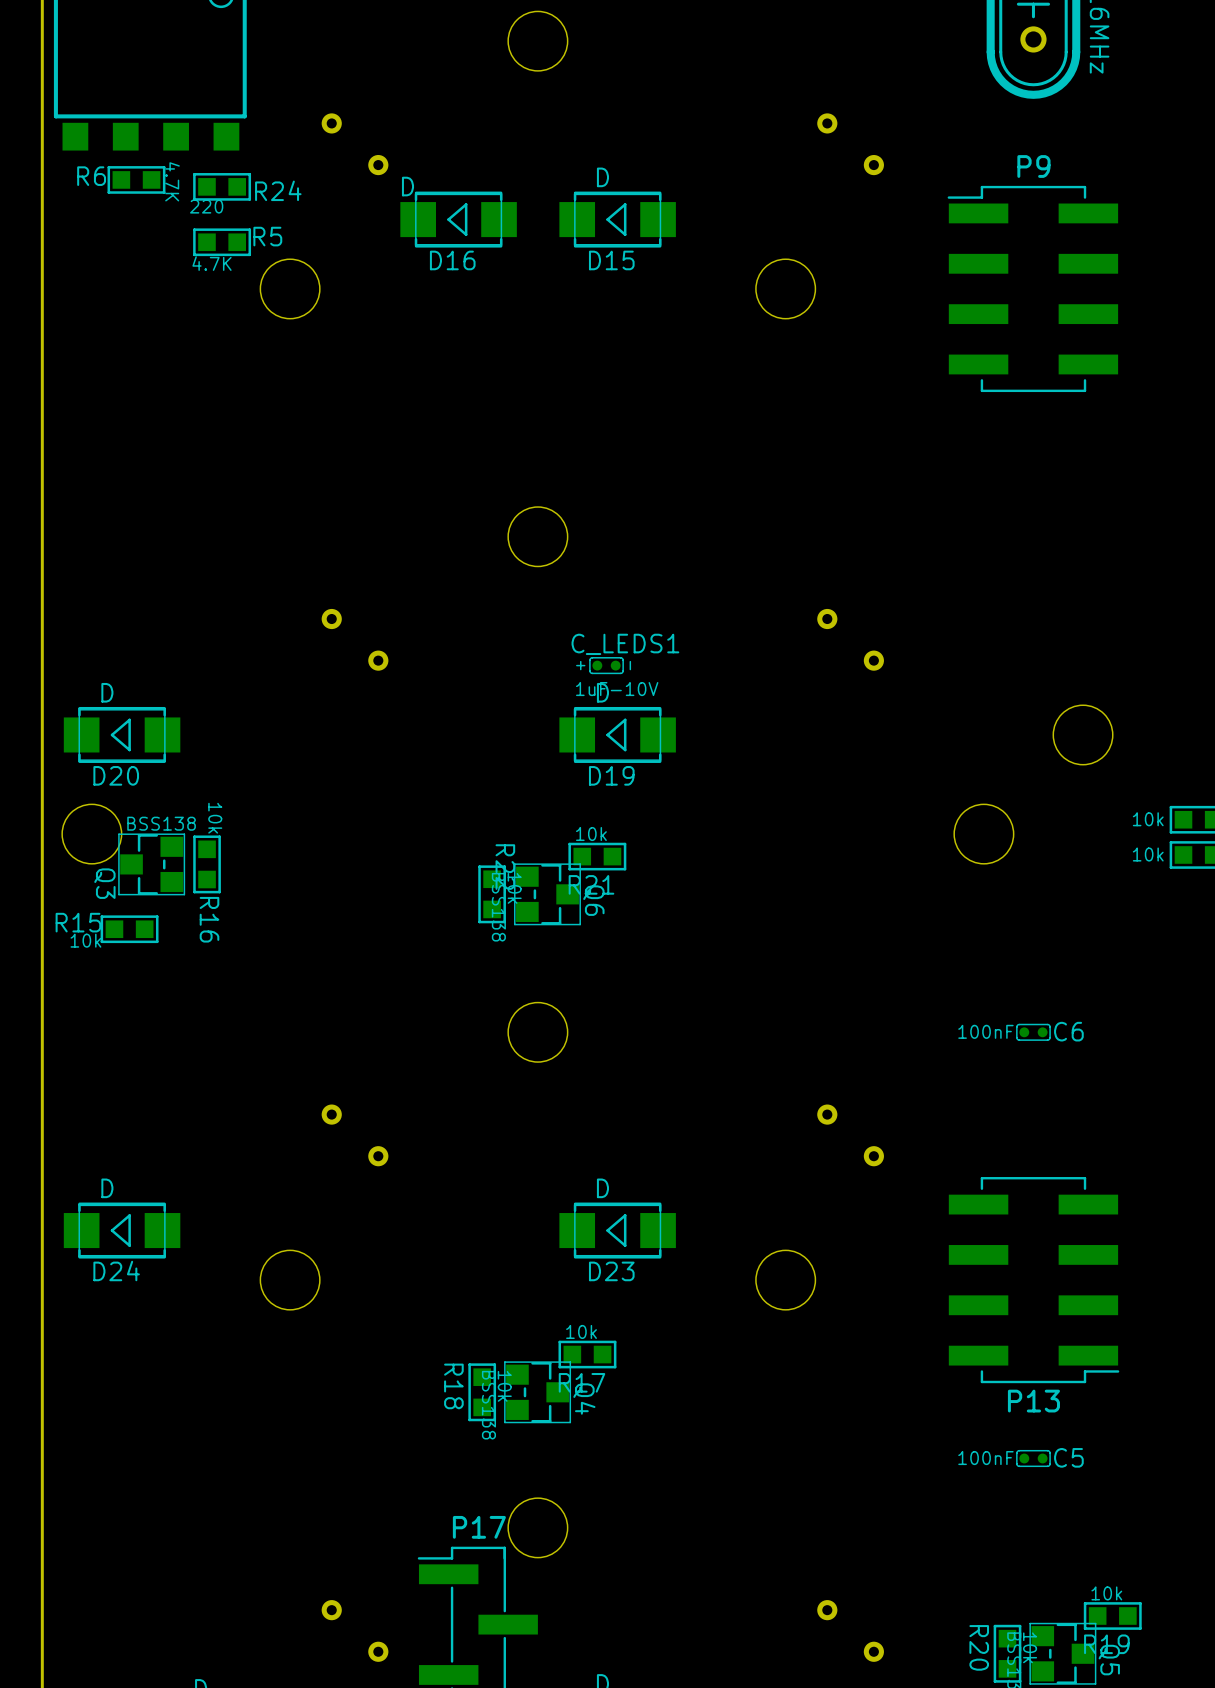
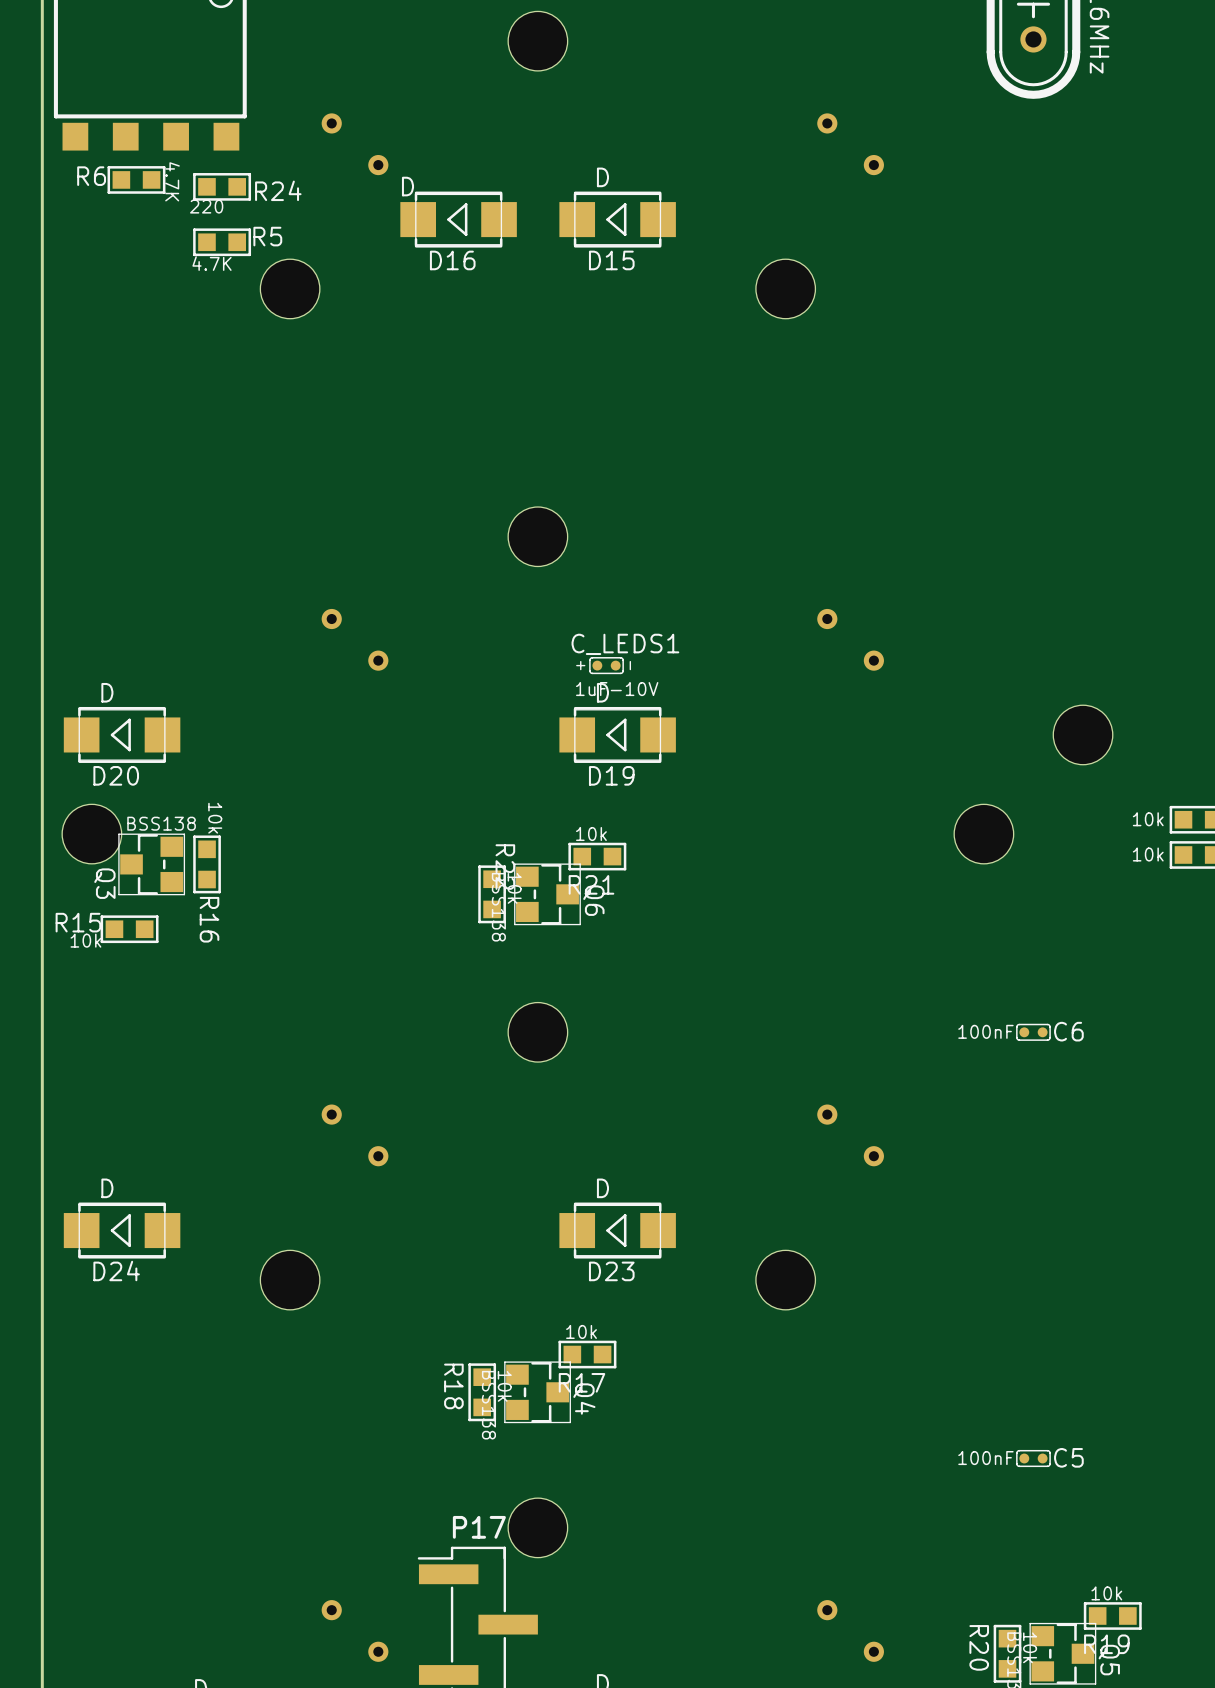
P9: (1032, 288) -> none
P13: (1034, 1280) -> none

